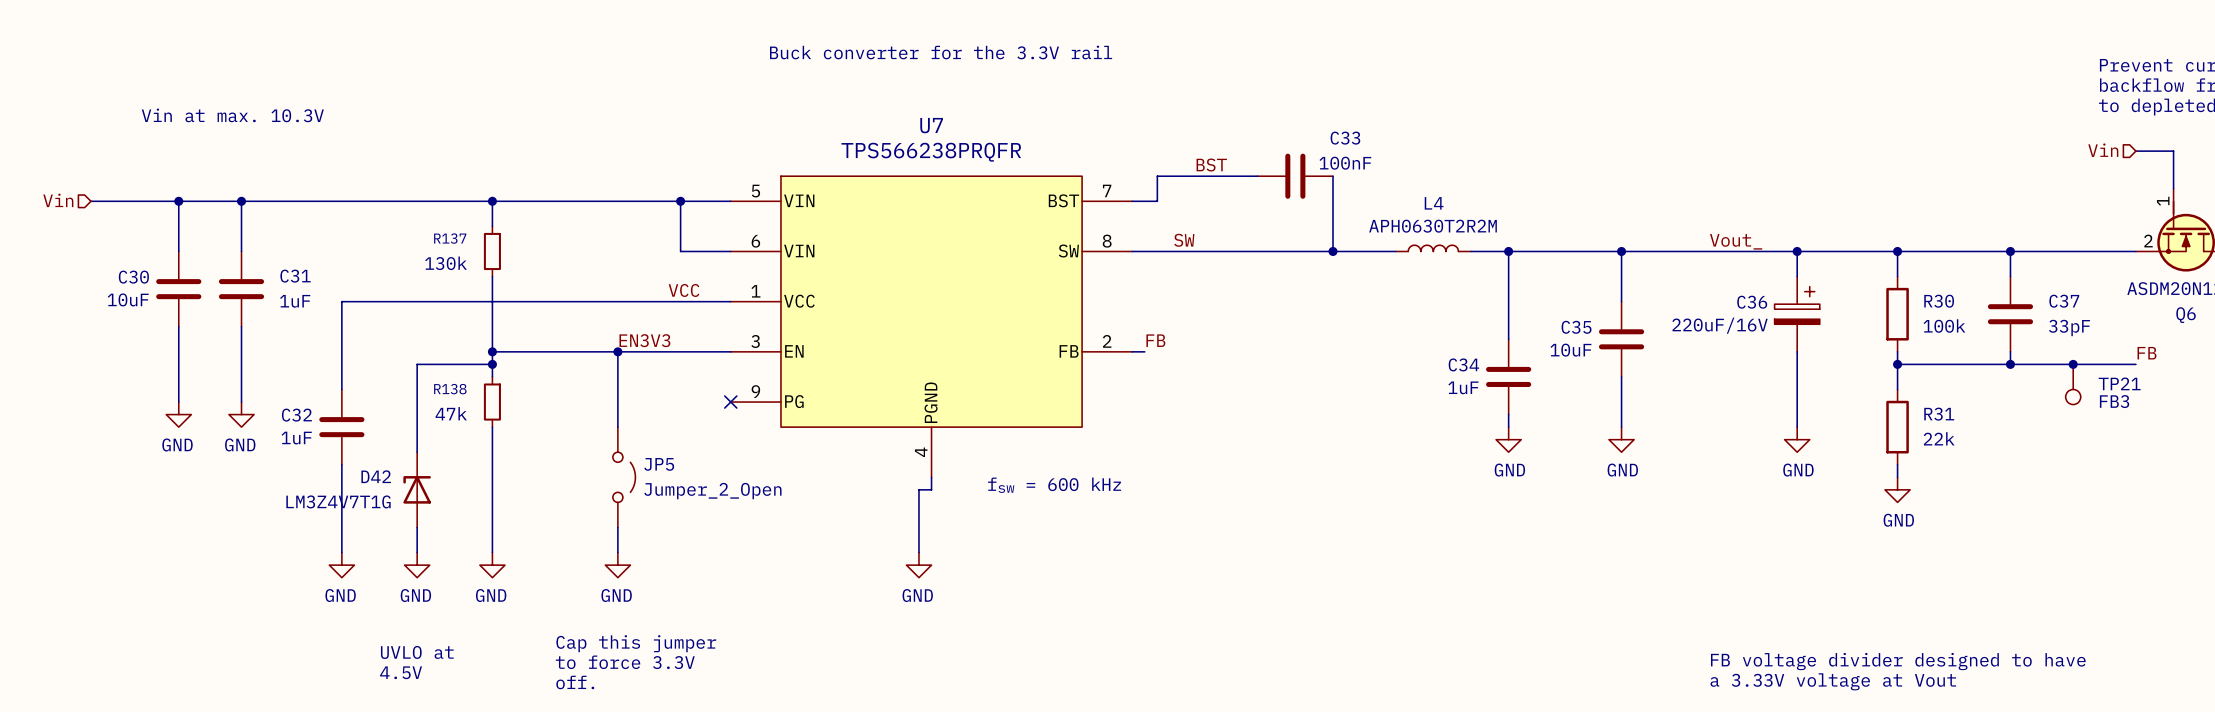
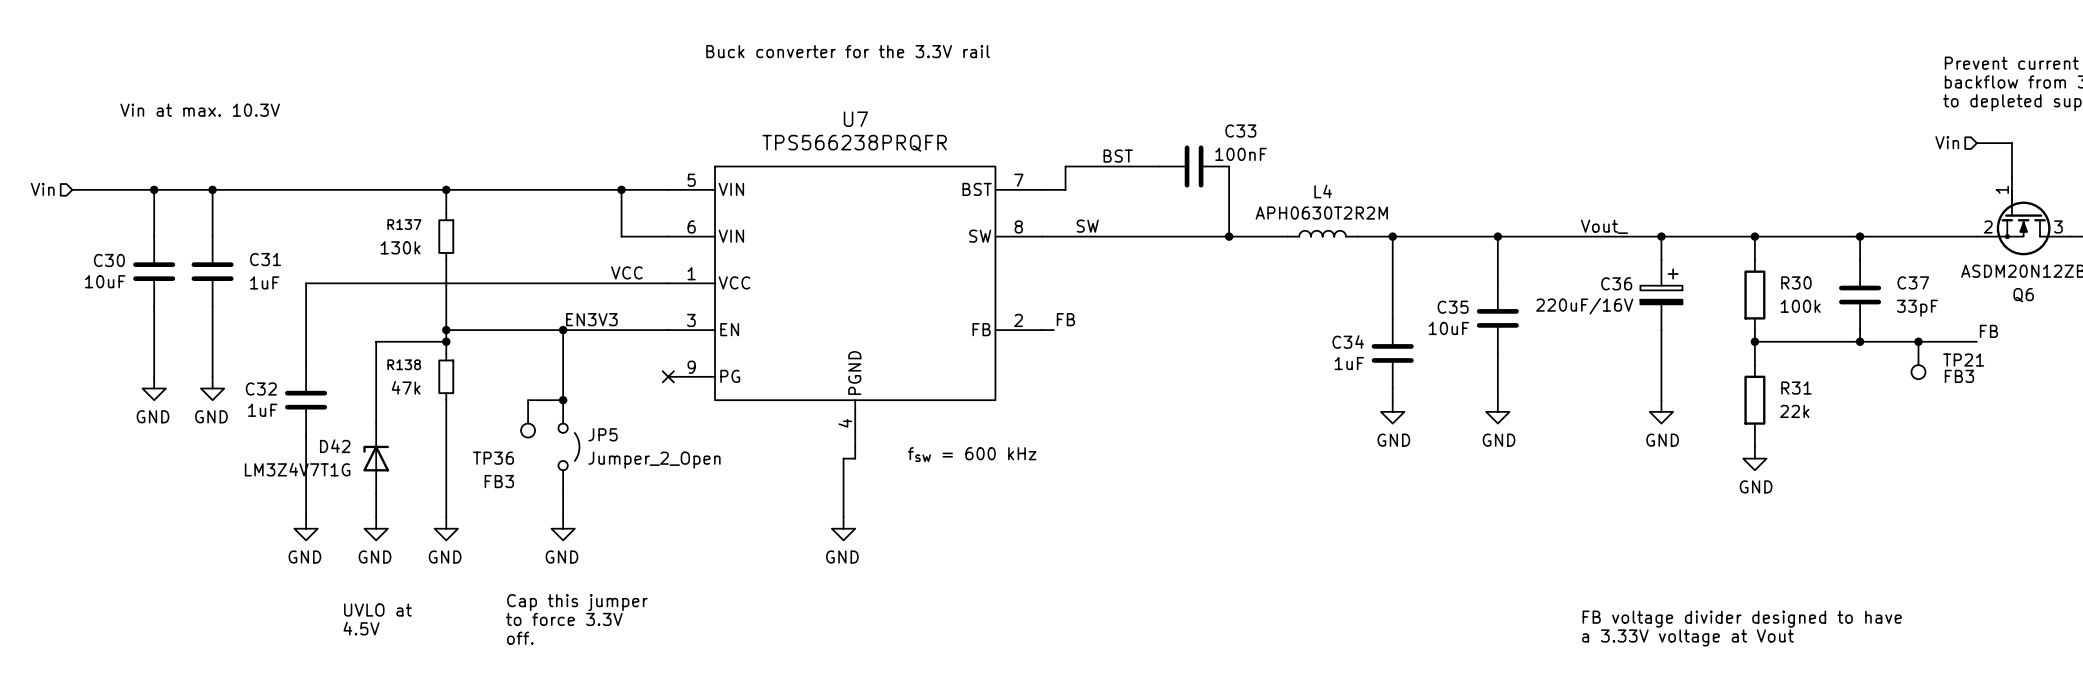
wire: none -> (528, 400) (563, 400)
junction: none -> (563, 400)
TP36: none -> FB3 (528, 418)

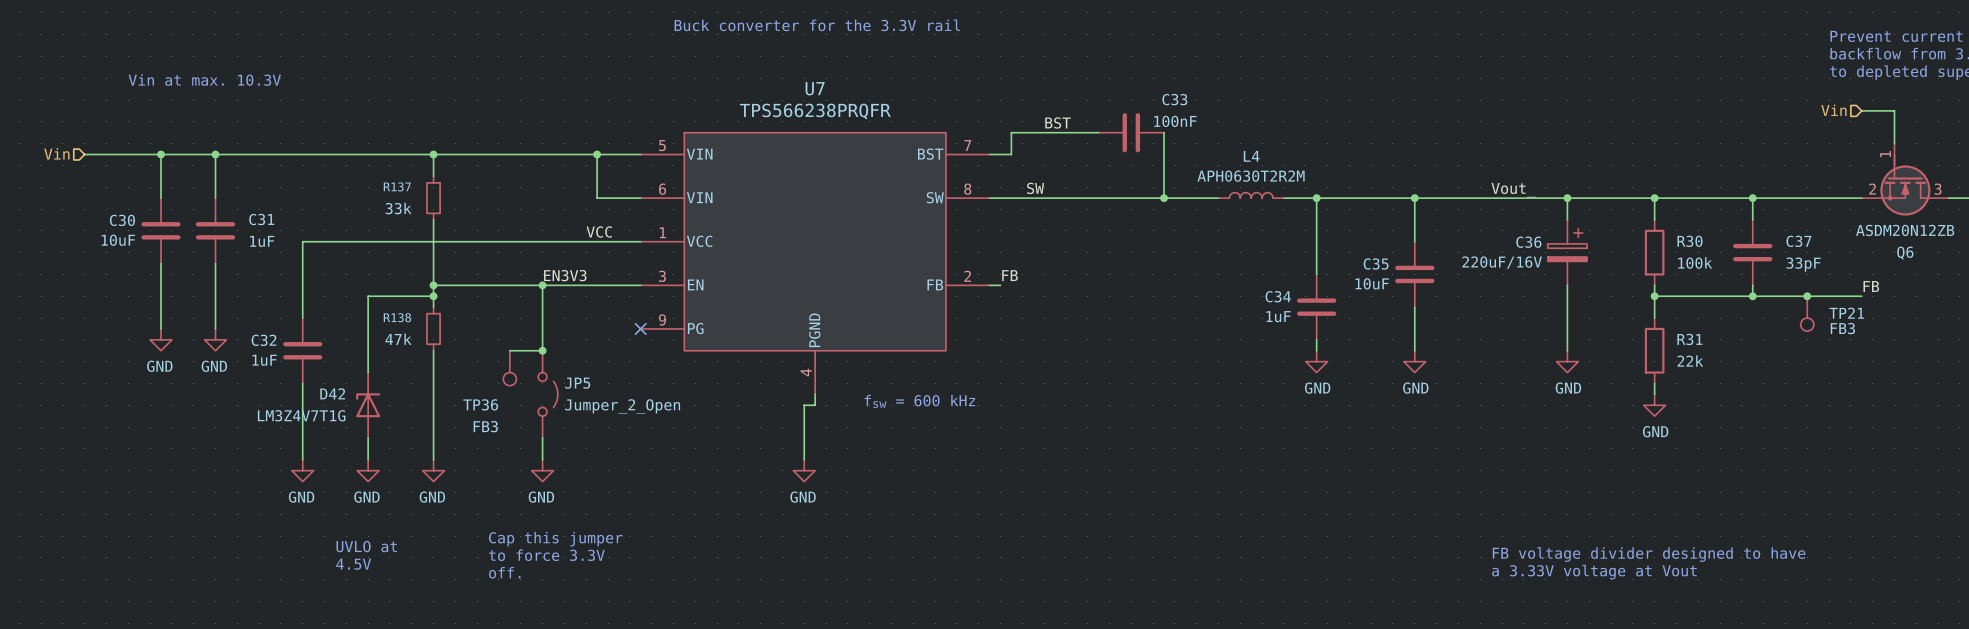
R137 value: 130k (400, 247) -> 33k (398, 208)

